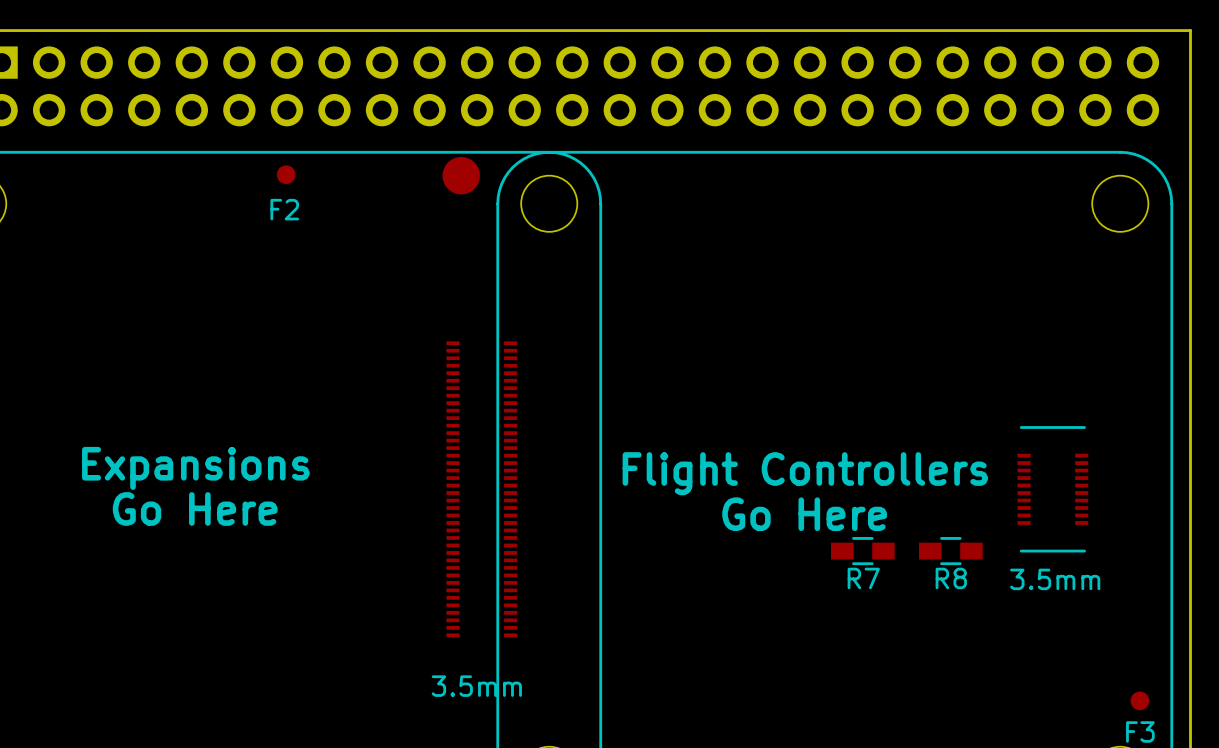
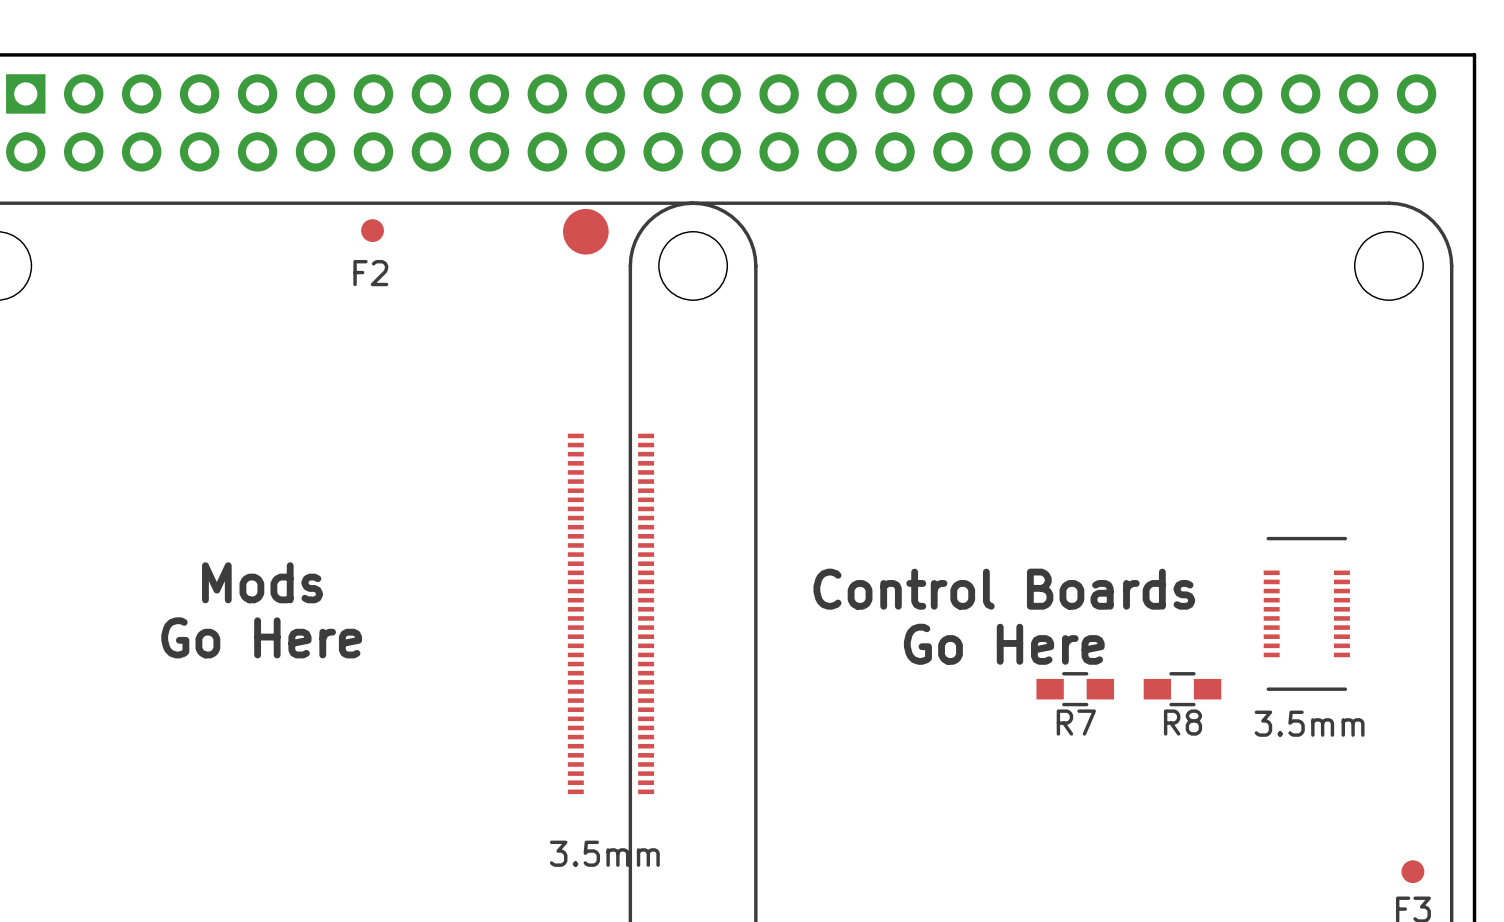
text: Expansions (195, 468) -> Mods (262, 582)
text: Flight Controllers (805, 473) -> Control Boards (1004, 589)

